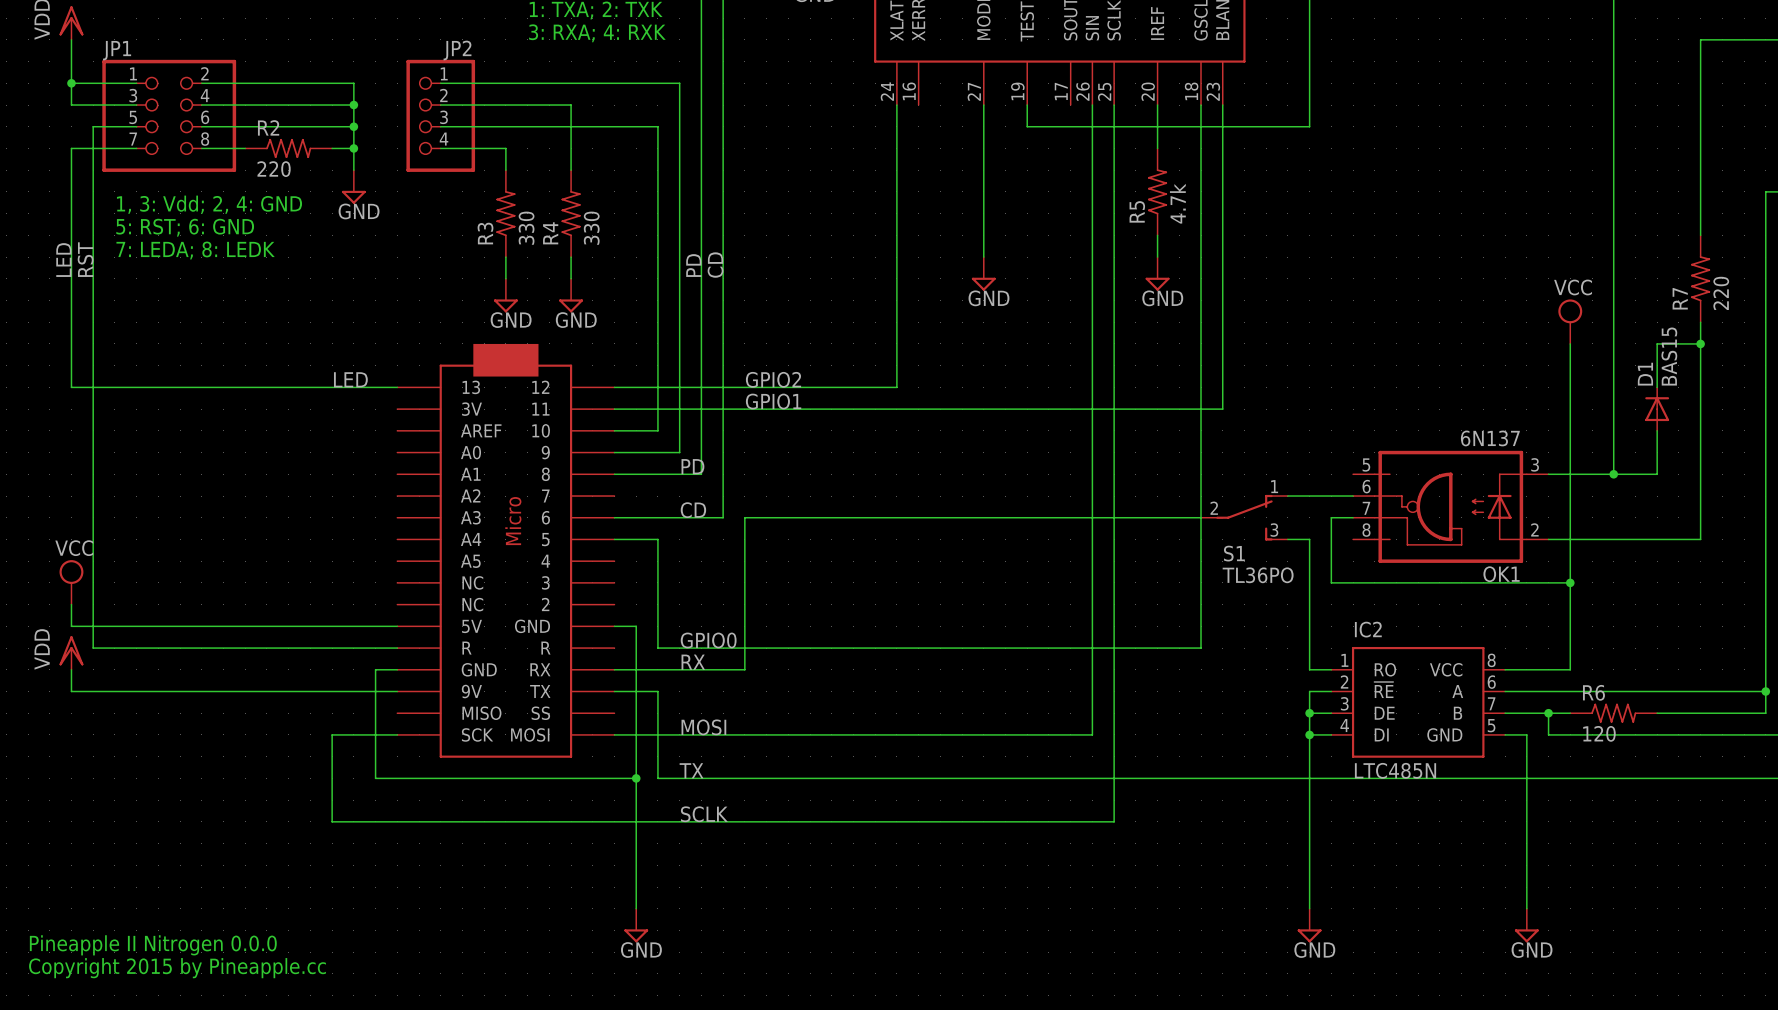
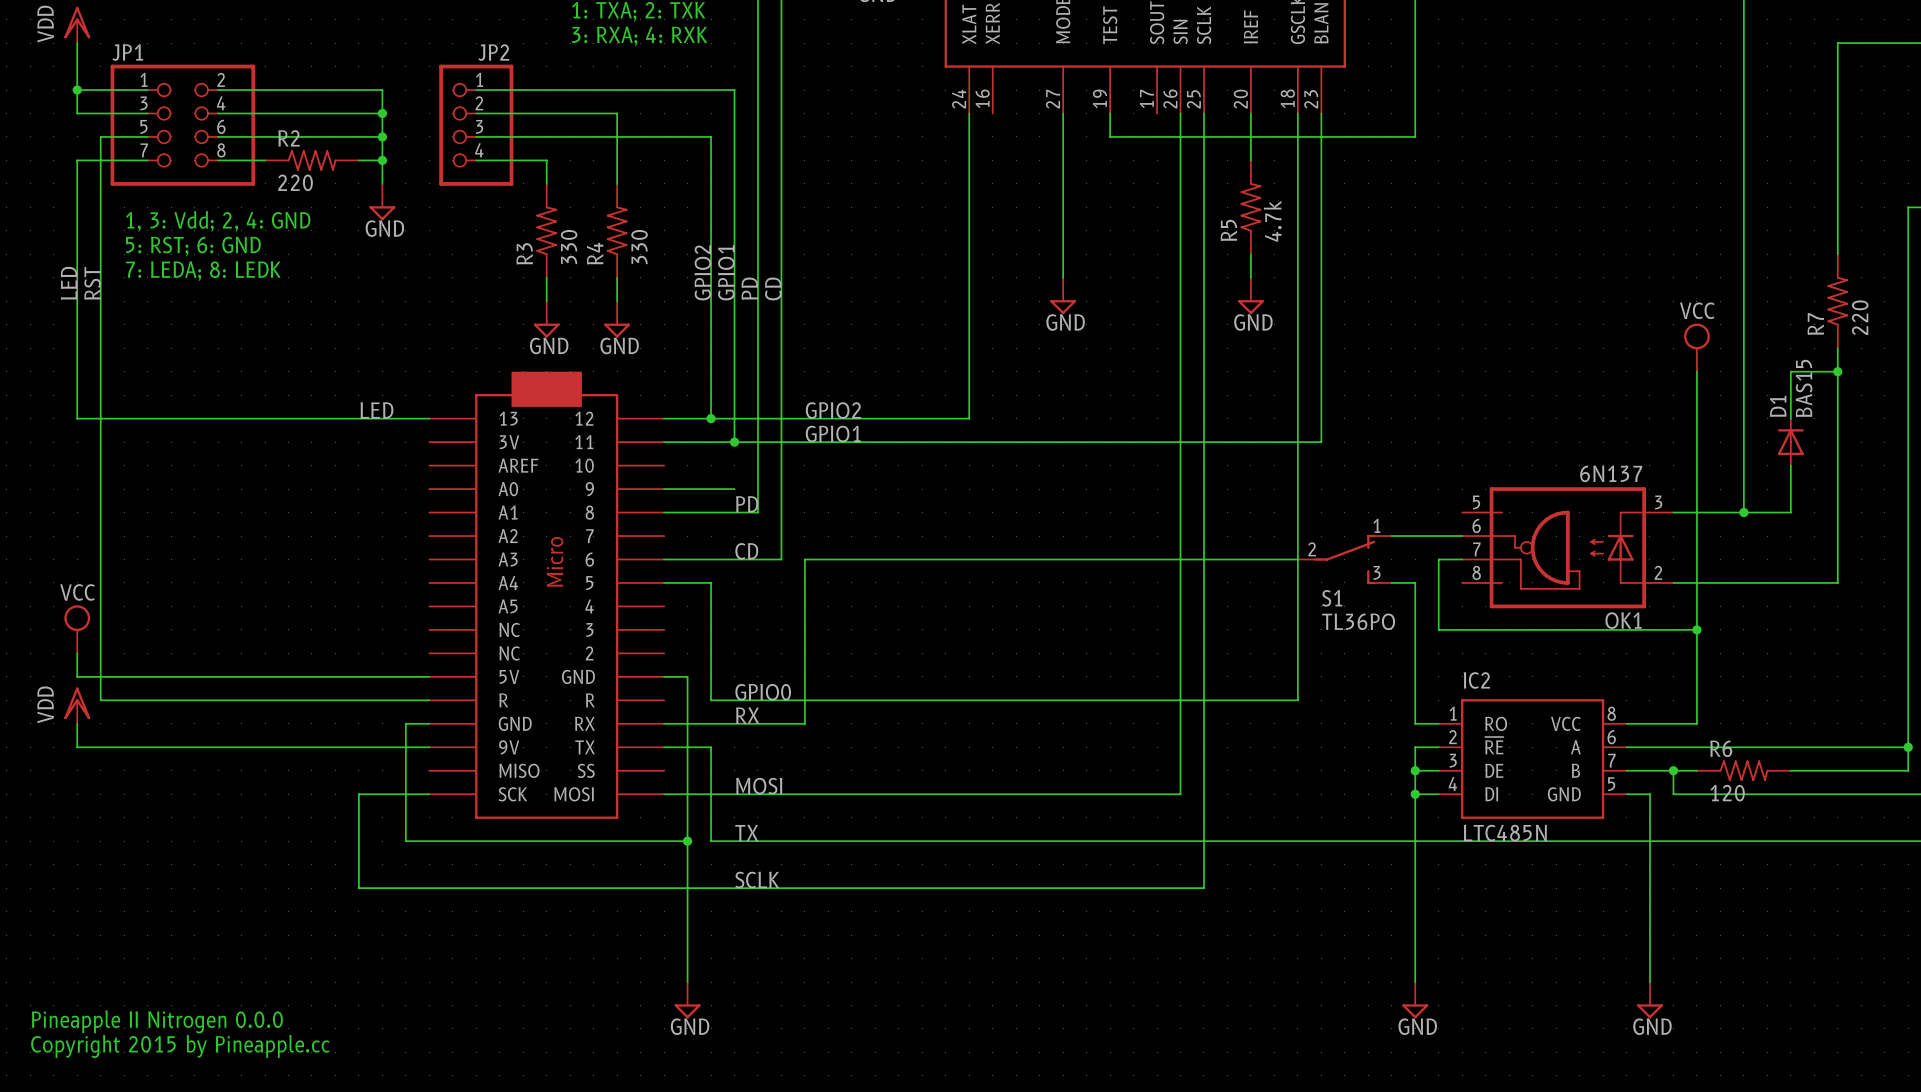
label: none -> GPIO2 (702, 272)
label: none -> GPIO1 (726, 272)
wire: (657, 387) (657, 430) (614, 430) -> none
junction: none -> (711, 418)
wire: (679, 409) (679, 452) -> none
junction: none -> (734, 442)

